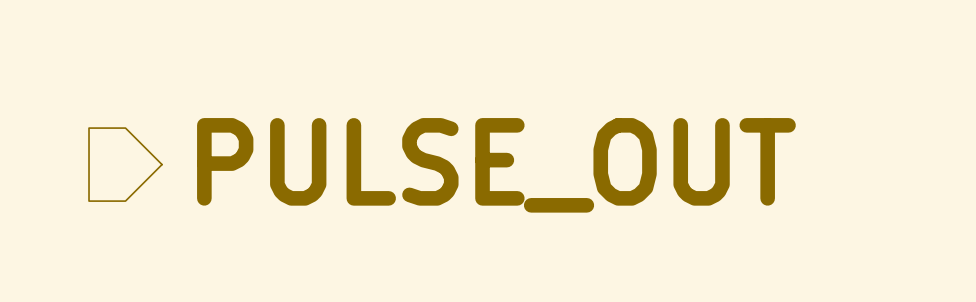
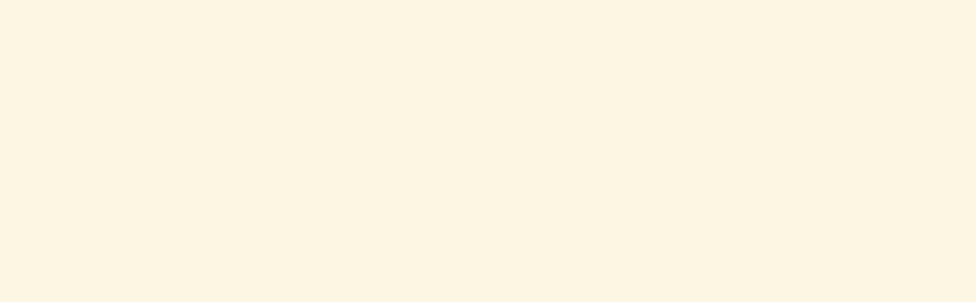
hierarchical label: PULSE_OUT (496, 165) -> none

